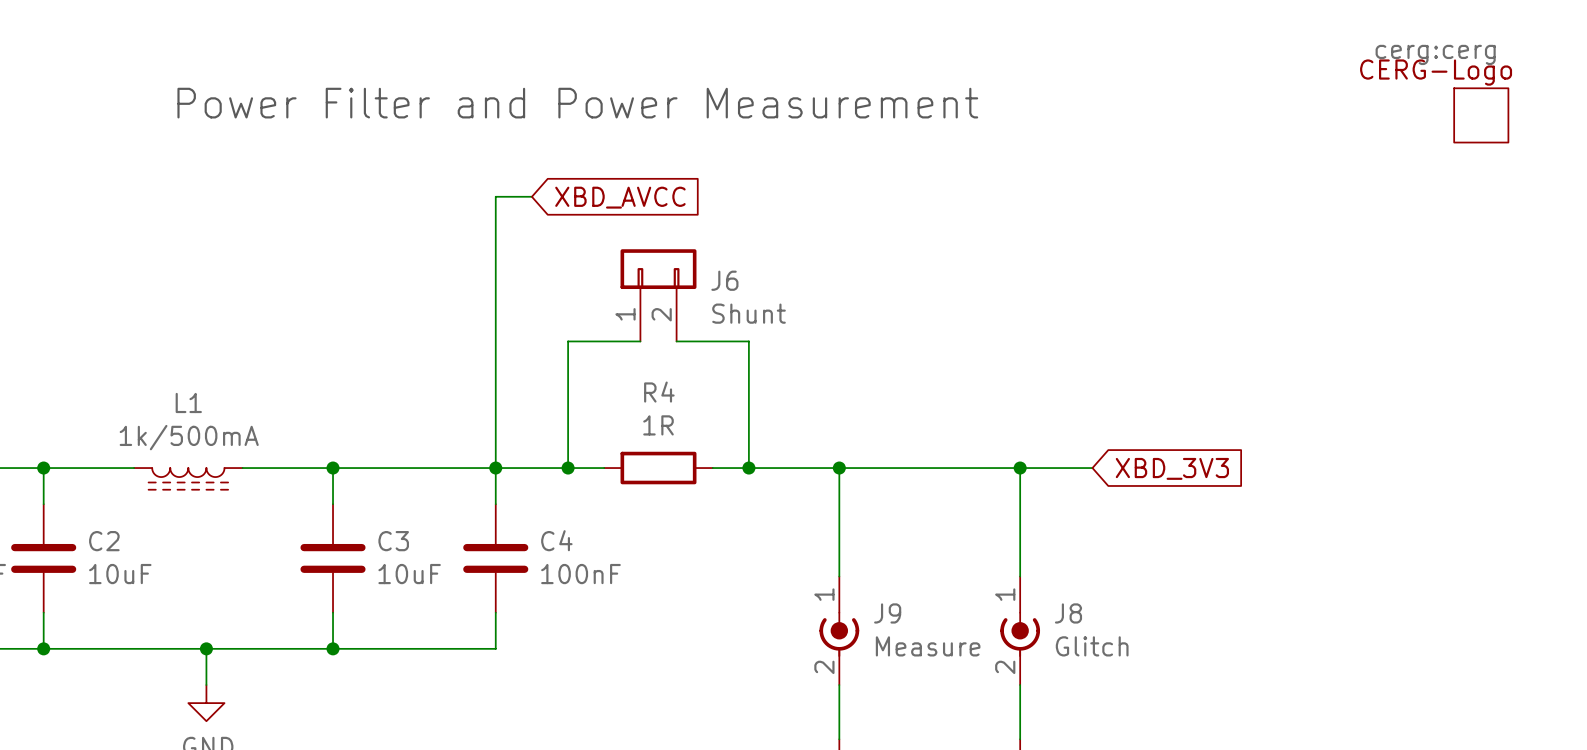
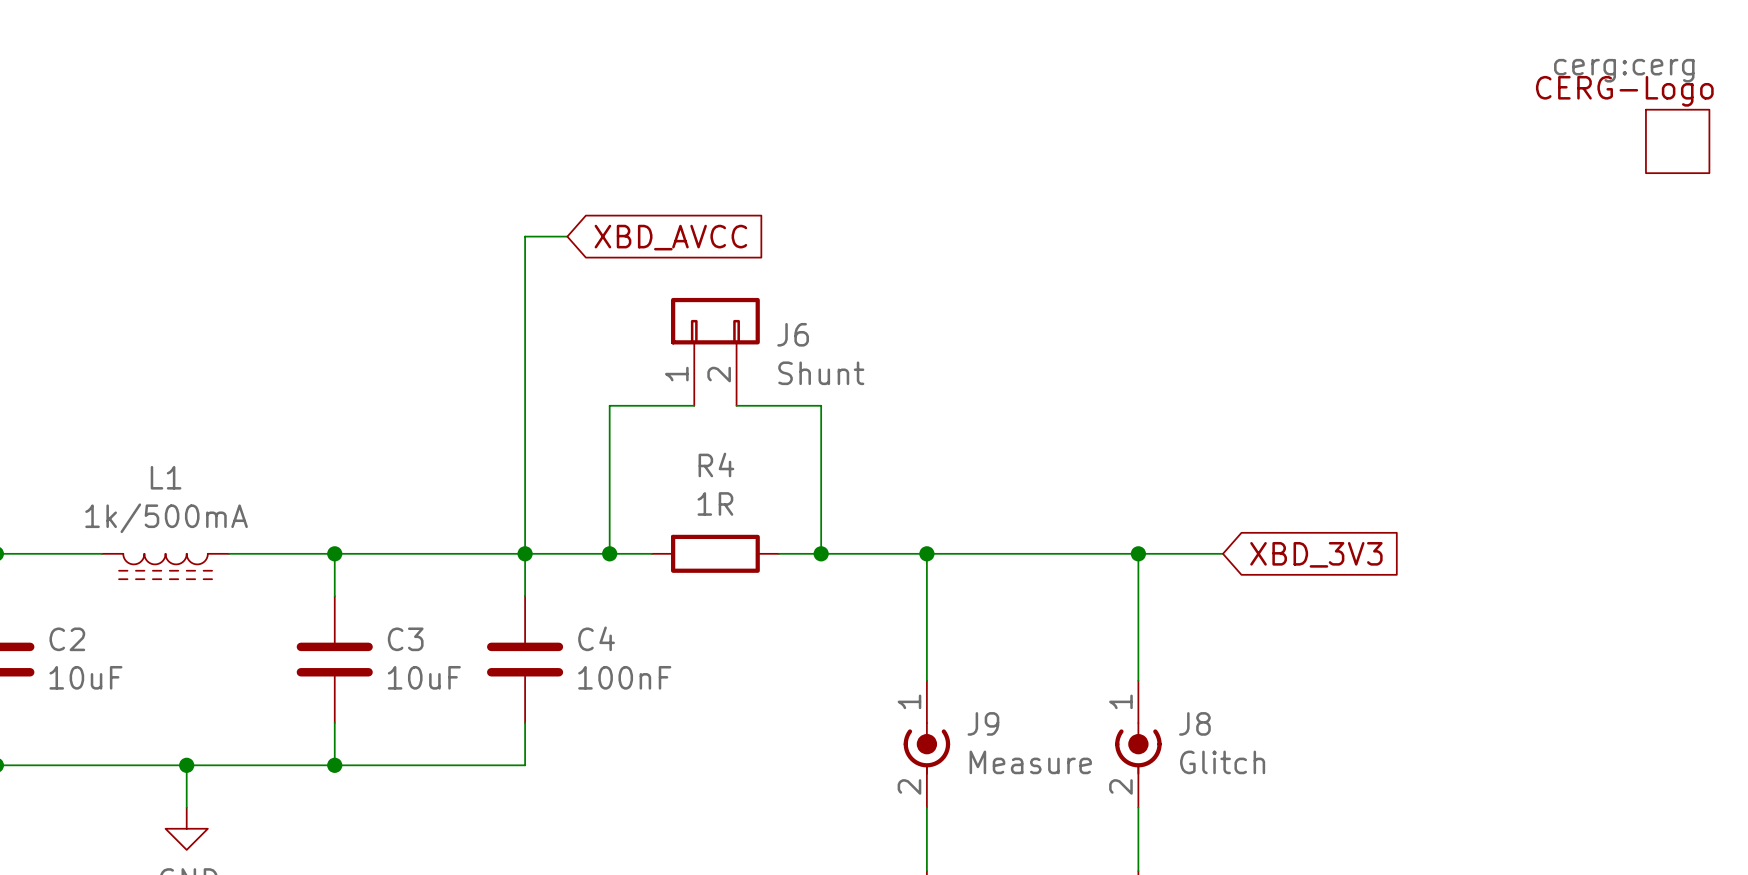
text: Power Filter and Power Measurement (577, 103) -> none

